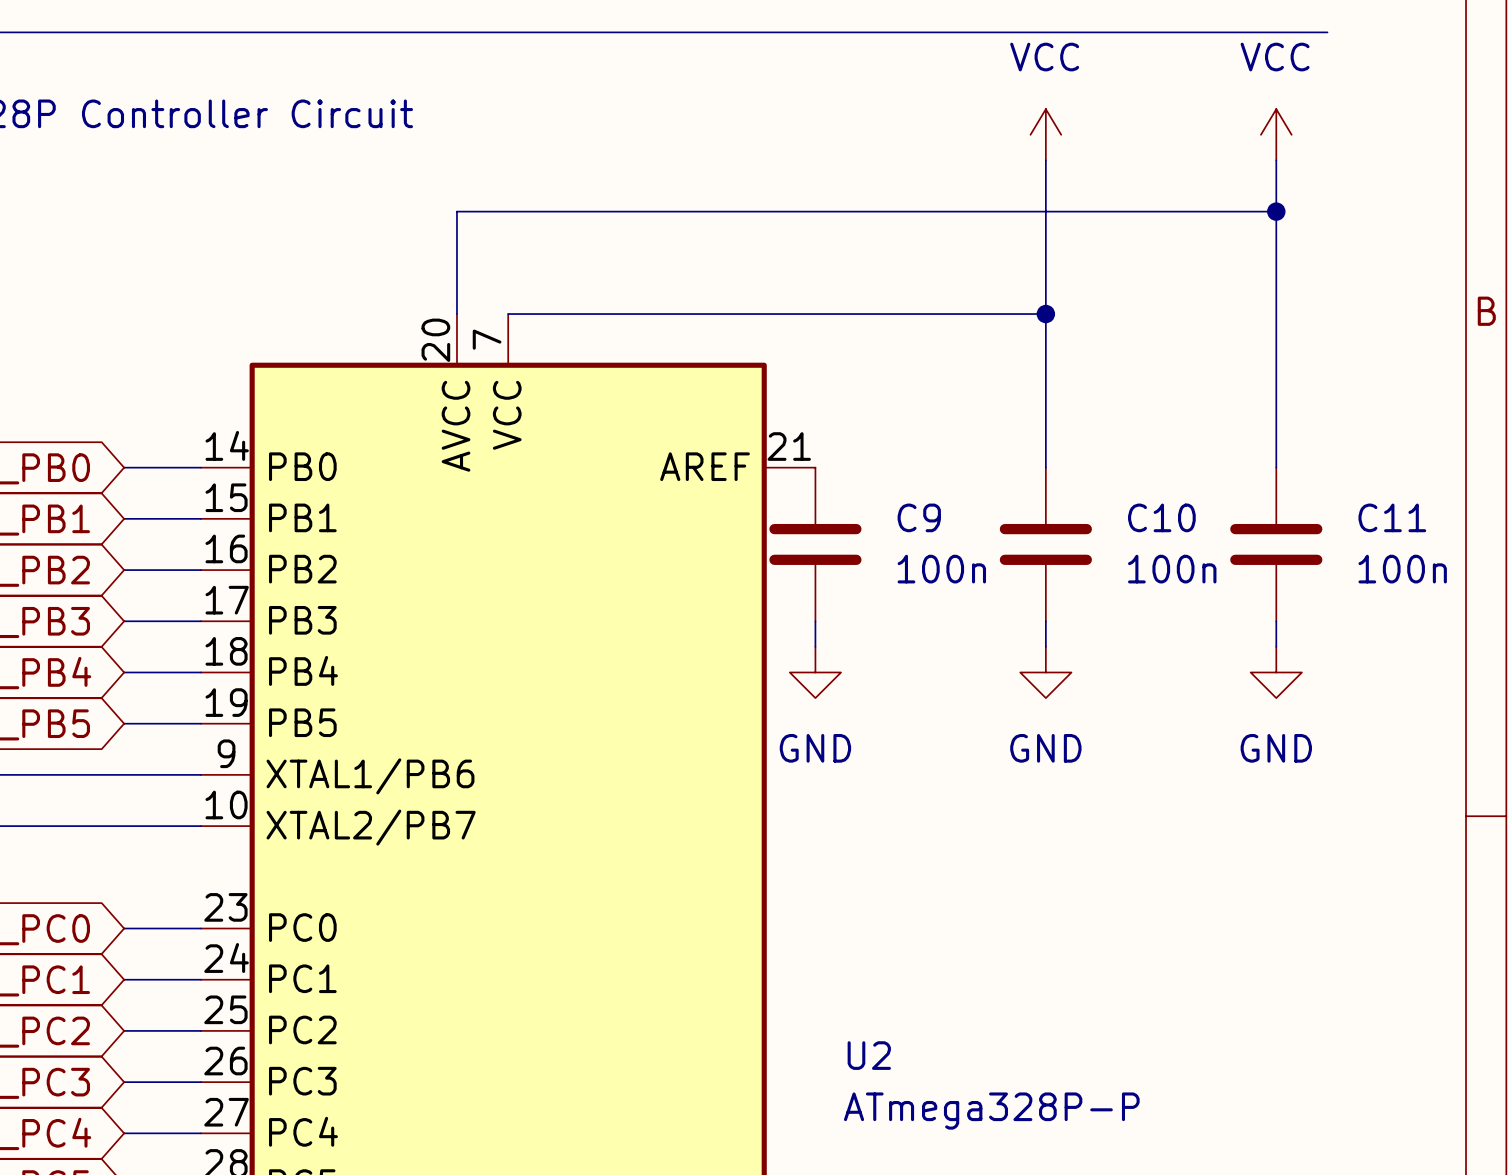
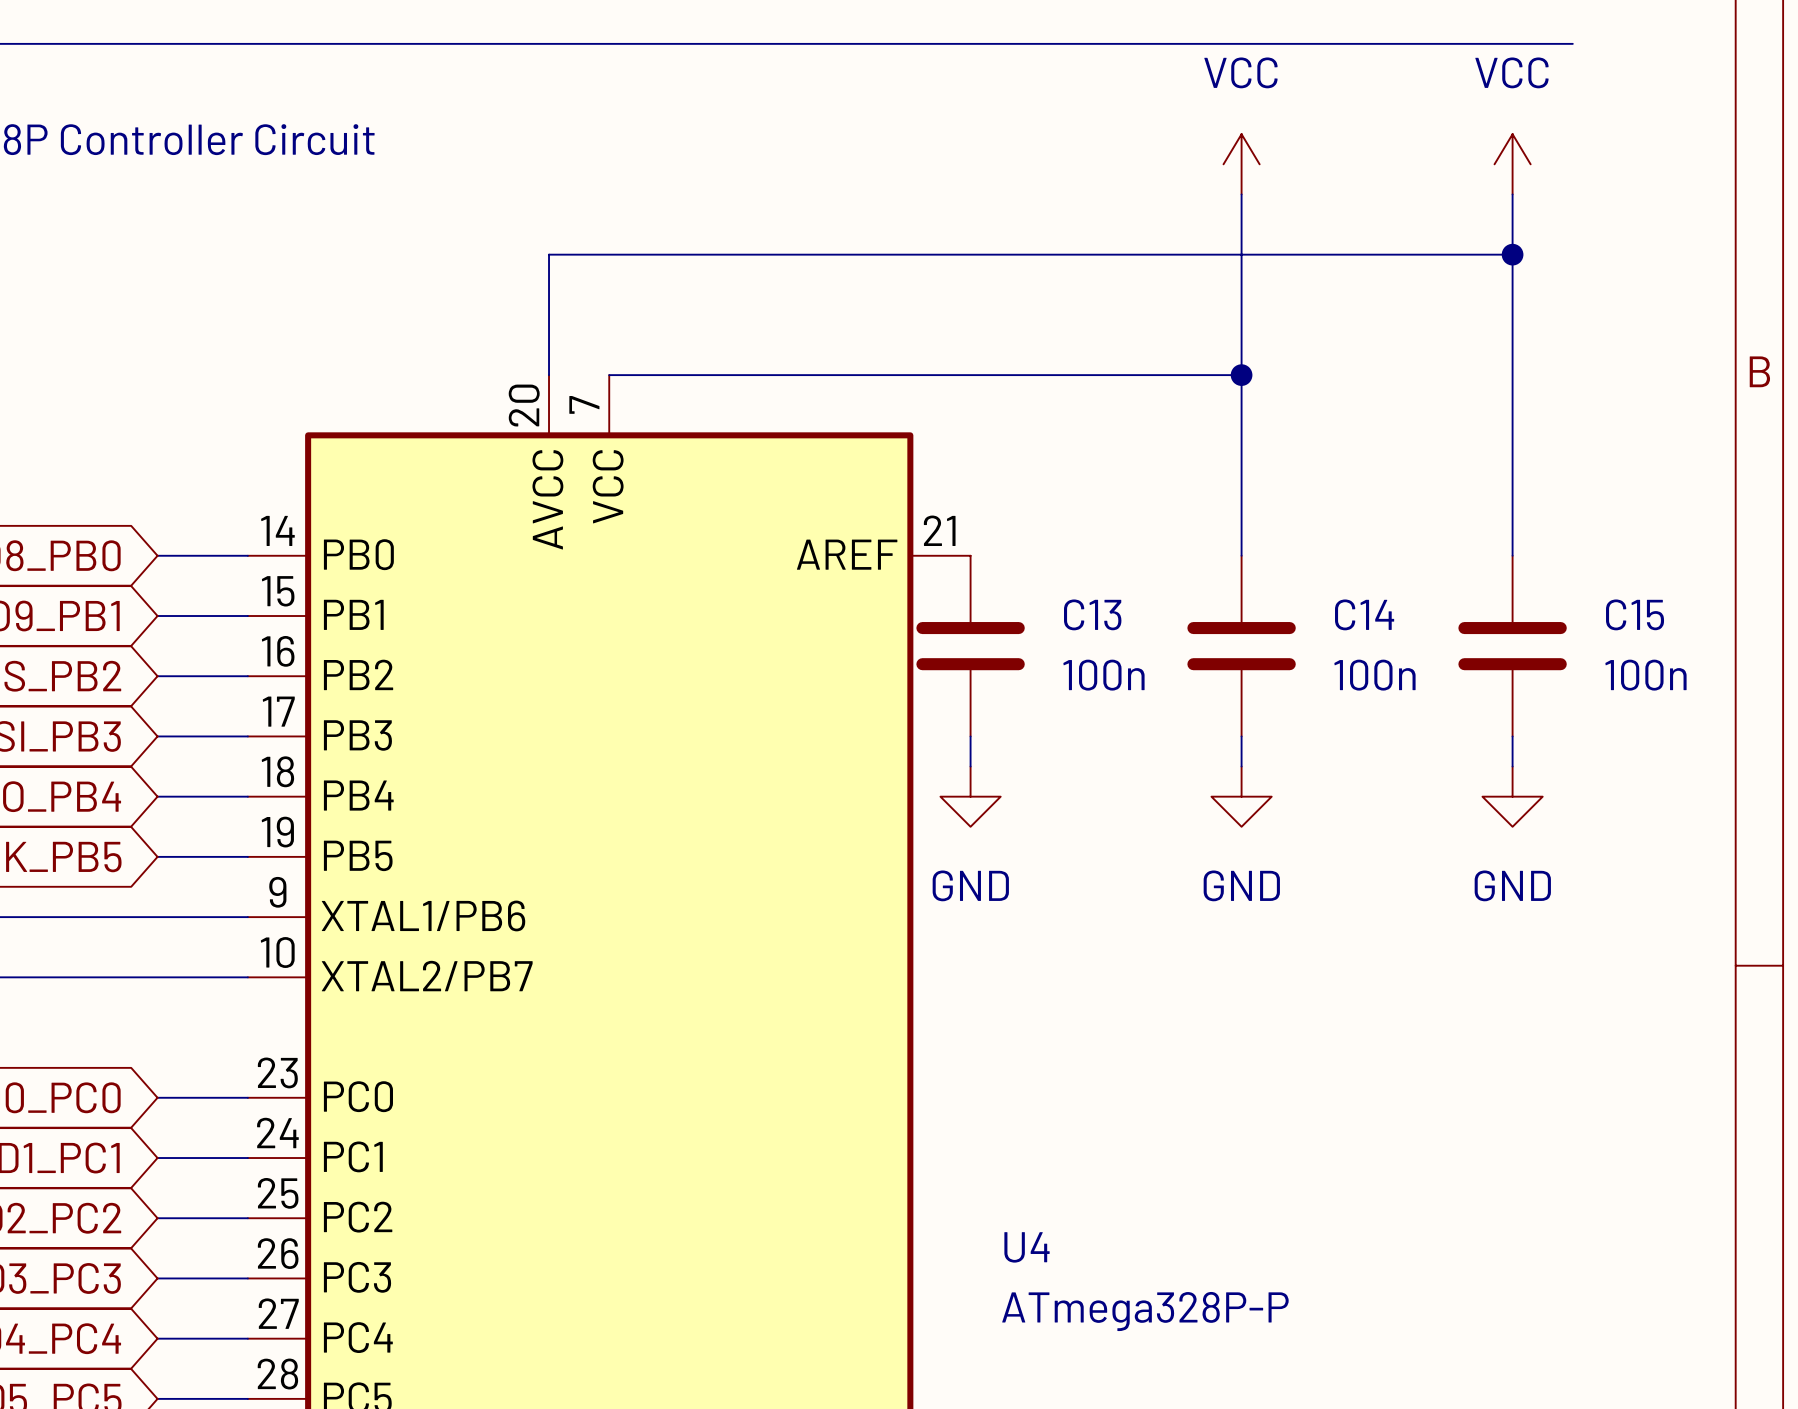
C9 name: C9 (919, 517) -> C13 (1092, 614)
C10 name: C10 (1161, 517) -> C14 (1364, 614)
C11 name: C11 (1392, 517) -> C15 (1635, 614)
U2 name: U2 (869, 1055) -> U4 (1027, 1247)

